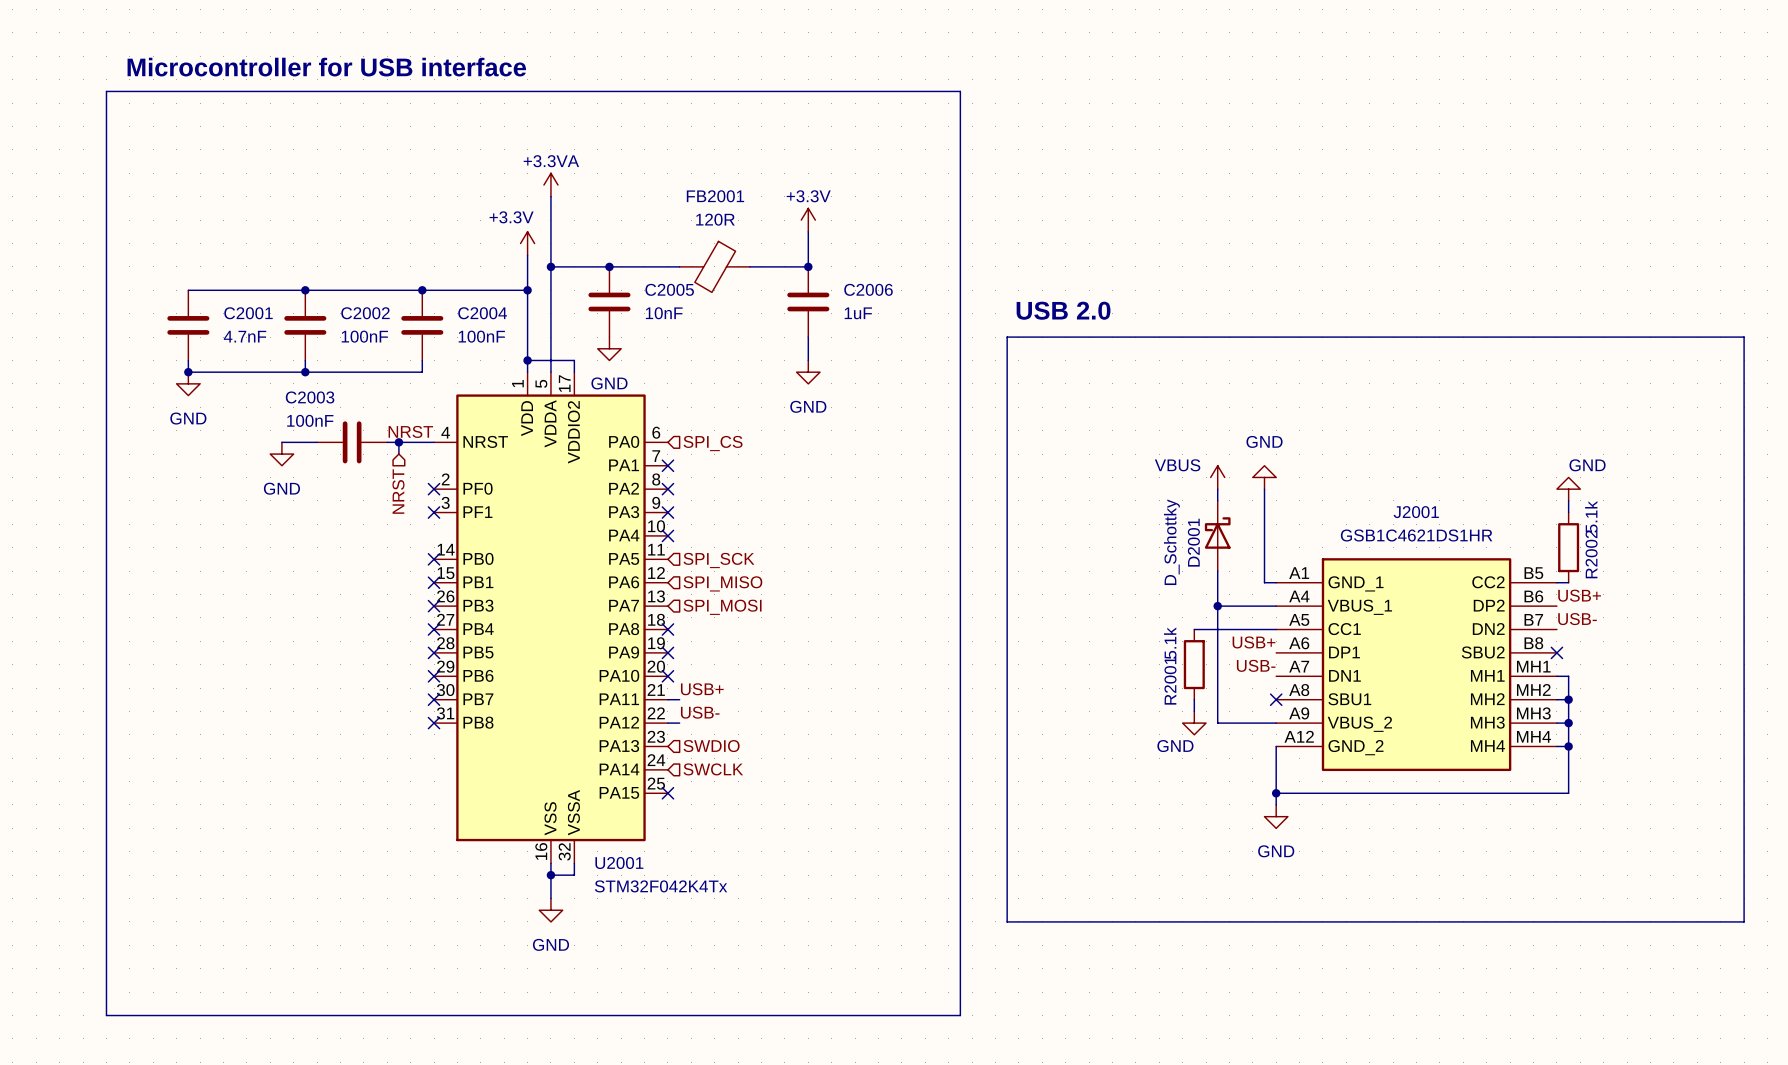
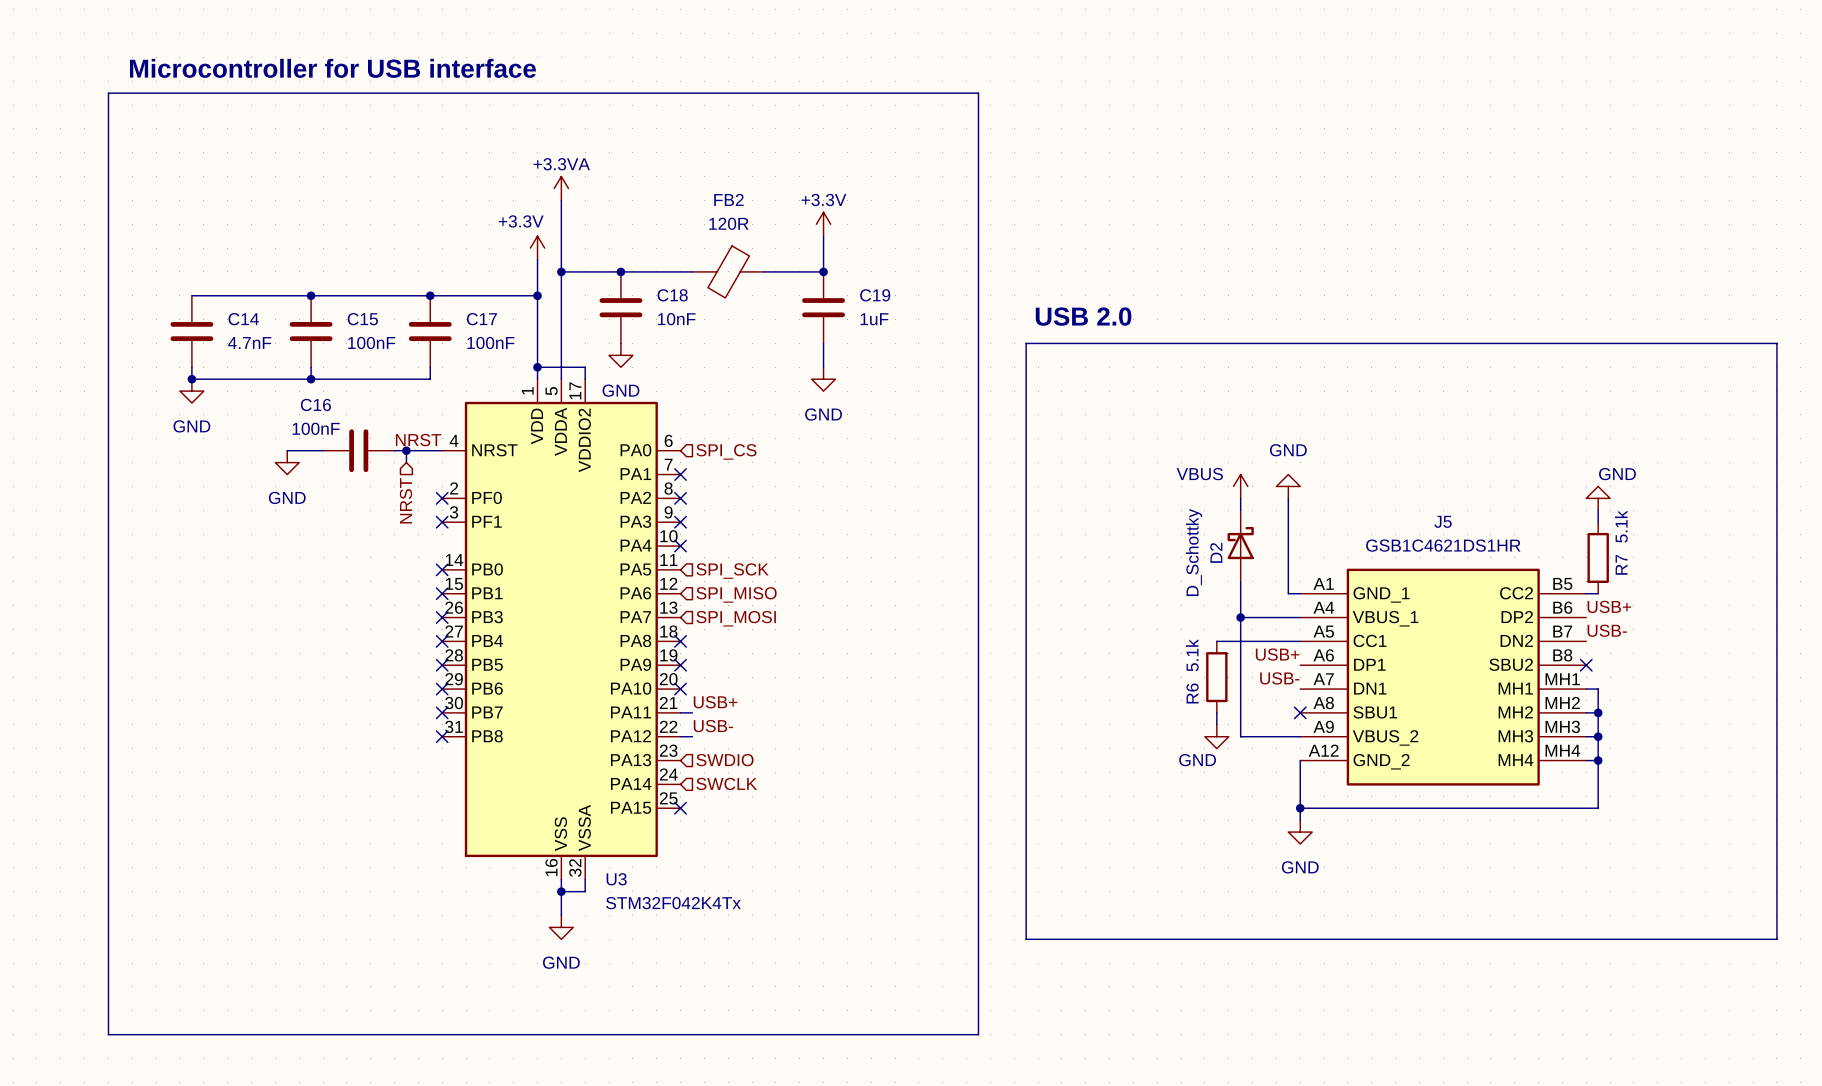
FB2001 name: FB2001 (715, 196) -> FB2 (728, 199)
C2005 name: C2005 (669, 289) -> C18 (672, 295)
C2006 name: C2006 (868, 289) -> C19 (875, 295)
C2001 name: C2001 (248, 313) -> C14 (243, 319)
C2002 name: C2002 (365, 313) -> C15 (362, 319)
C2004 name: C2004 (482, 313) -> C17 (481, 319)
C2003 name: C2003 (310, 397) -> C16 (315, 404)
J2001 name: J2001 (1416, 512) -> J5 (1443, 521)
D2001 name: D2001 (1193, 542) -> D2 (1216, 552)
R2002 name: R2002 (1591, 554) -> R7 (1621, 564)
R2001 name: R2001 (1170, 680) -> R6 (1192, 693)
U2001 name: U2001 (619, 863) -> U3 (616, 879)

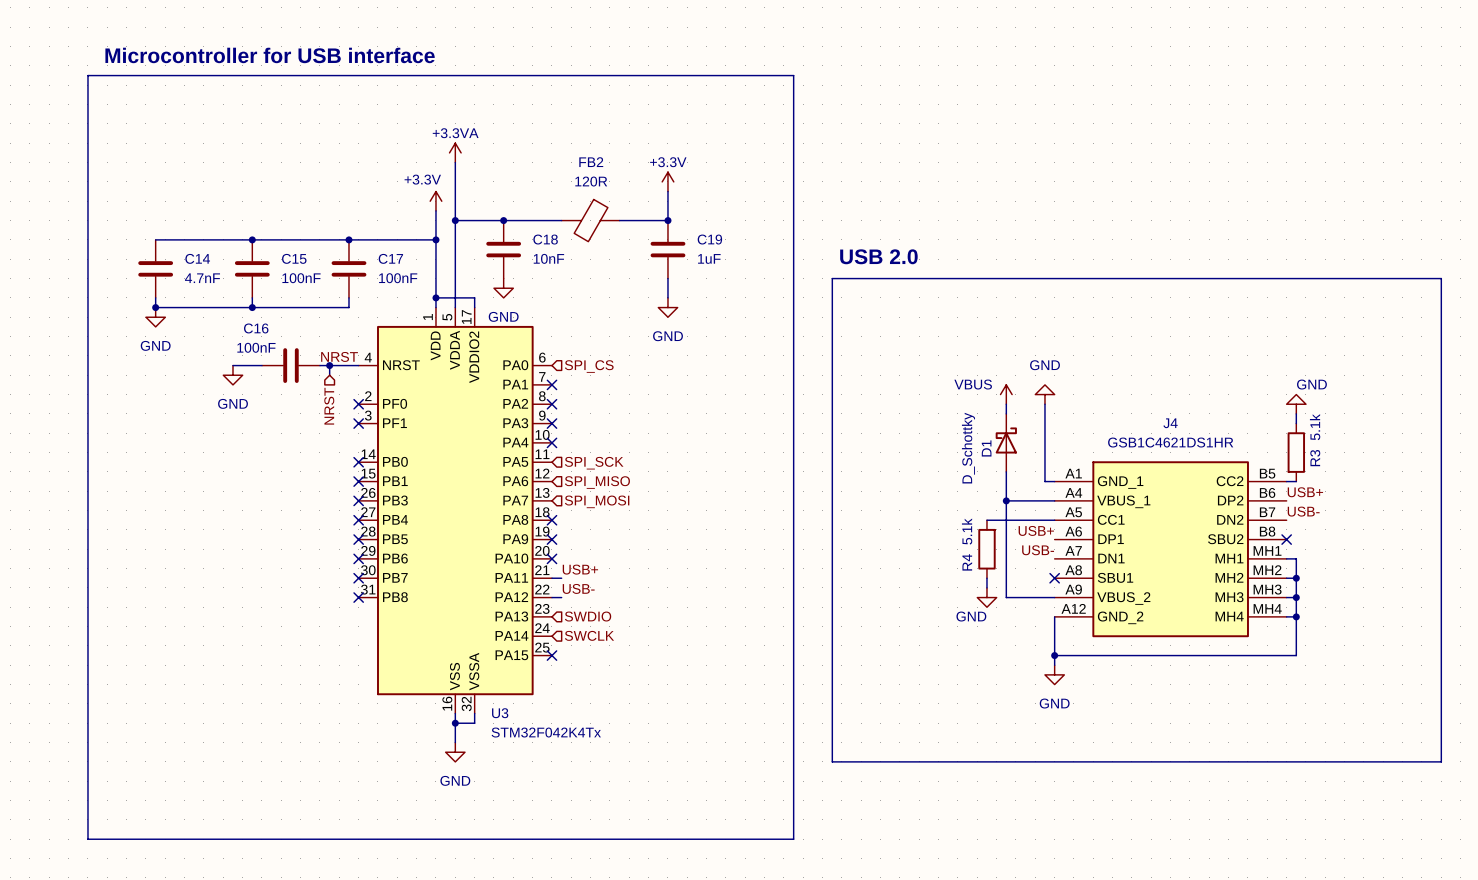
J5 name: J5 (1443, 521) -> J4 (1170, 423)
D2 name: D2 (1216, 552) -> D1 (986, 448)
R7 name: R7 (1621, 564) -> R3 (1315, 458)
R6 name: R6 (1192, 693) -> R4 (967, 562)

